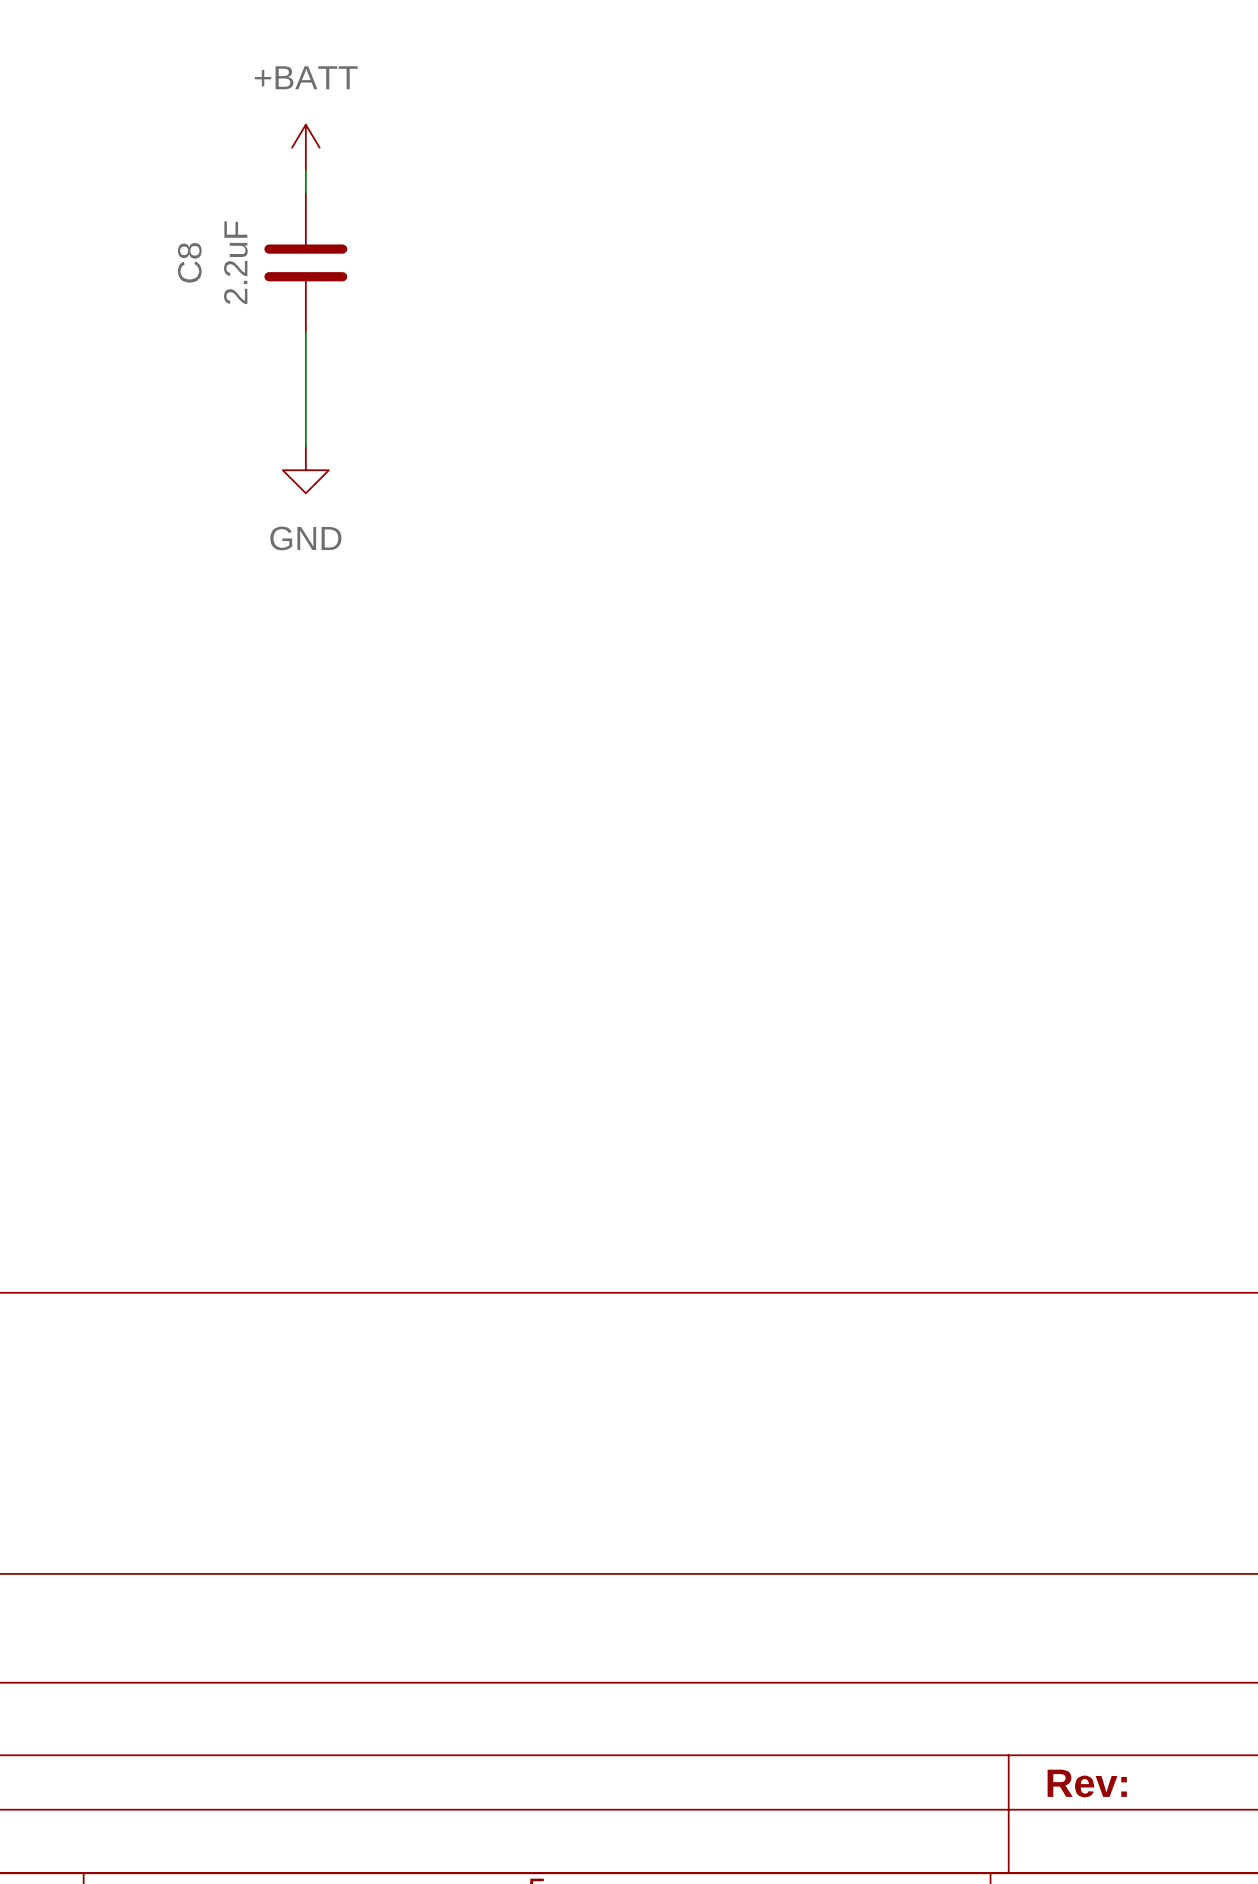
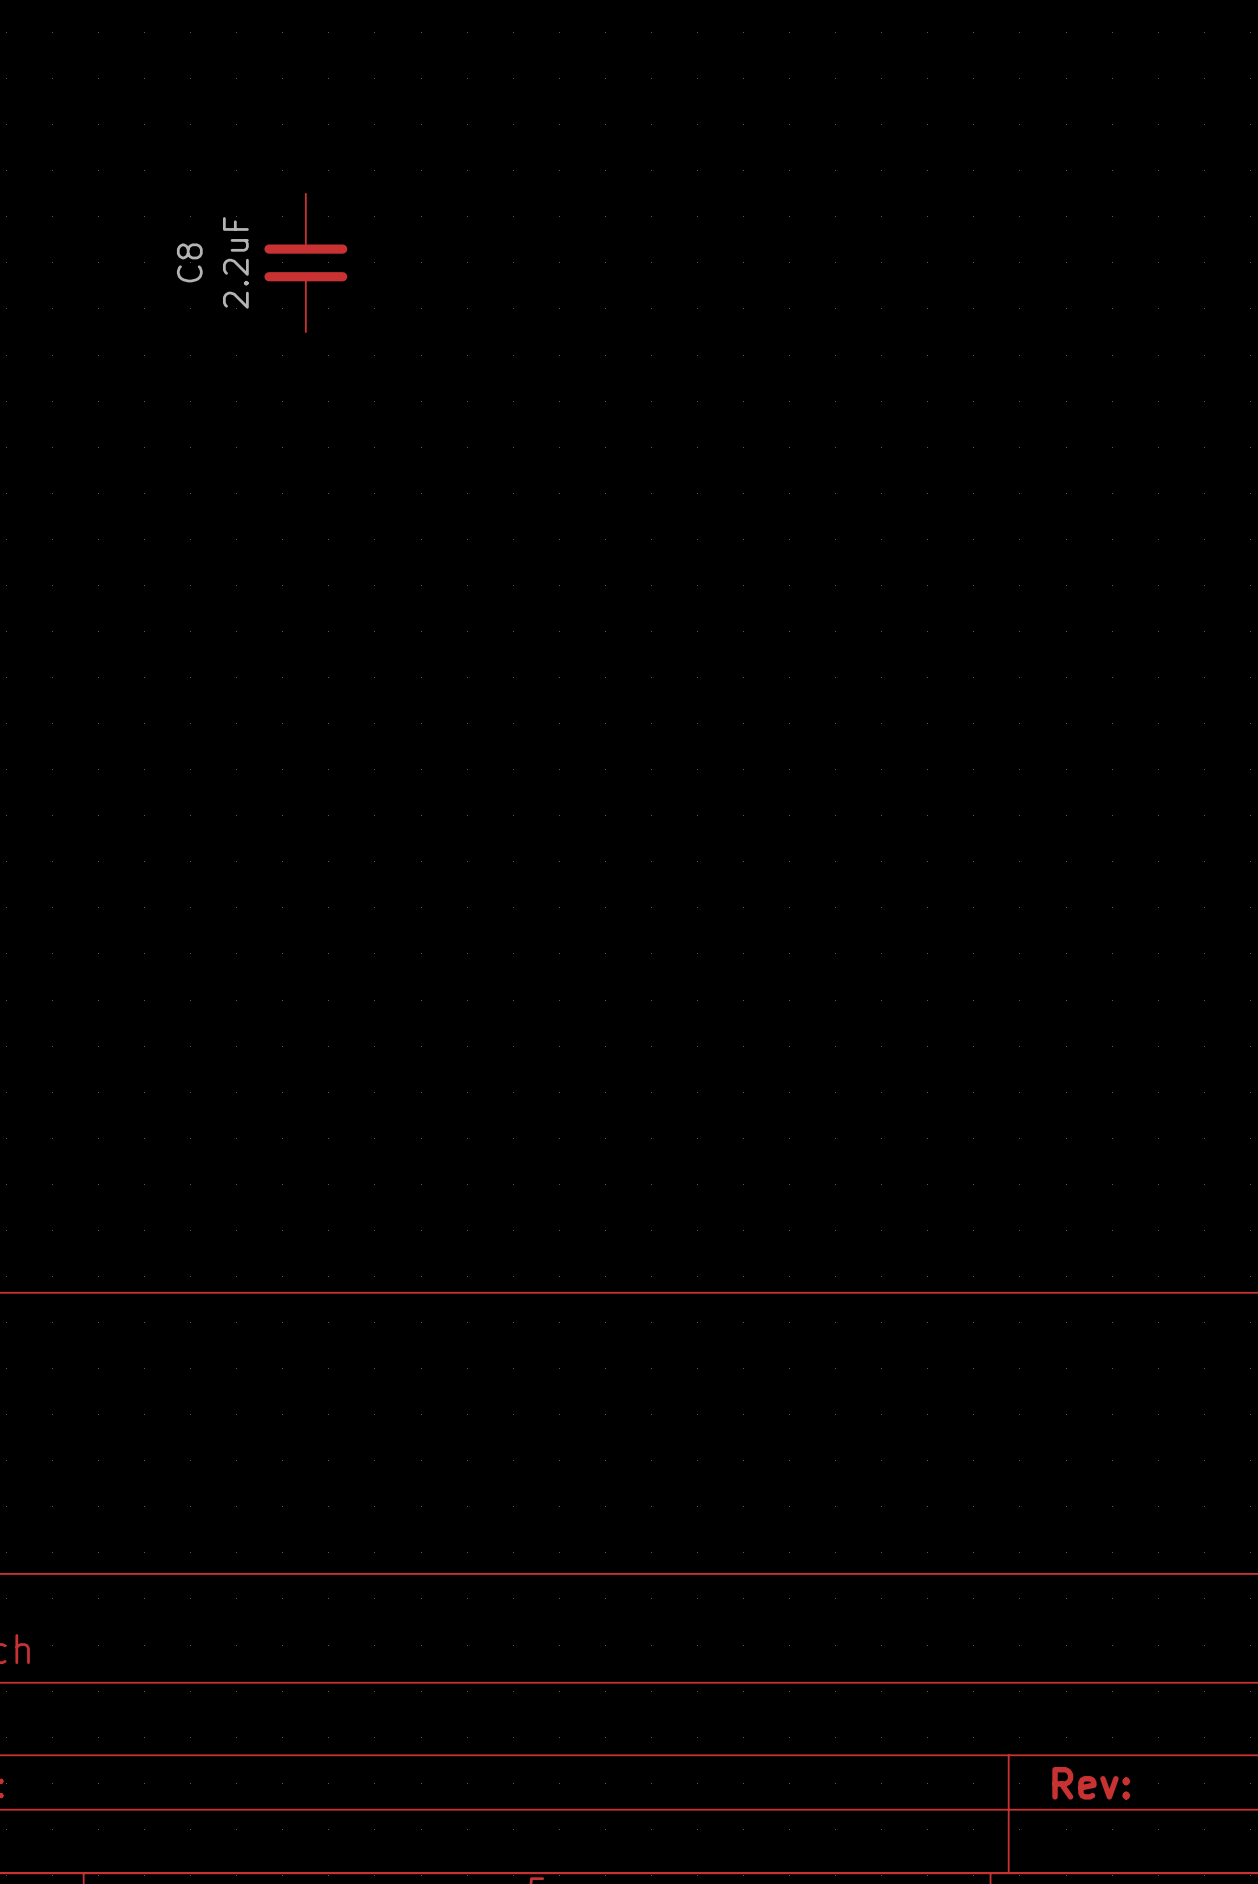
power symbol: +BATT (305, 147) -> none
wire: (305, 170) (305, 193) -> none
wire: (305, 332) (305, 447) -> none
power symbol: GND (305, 470) -> none

